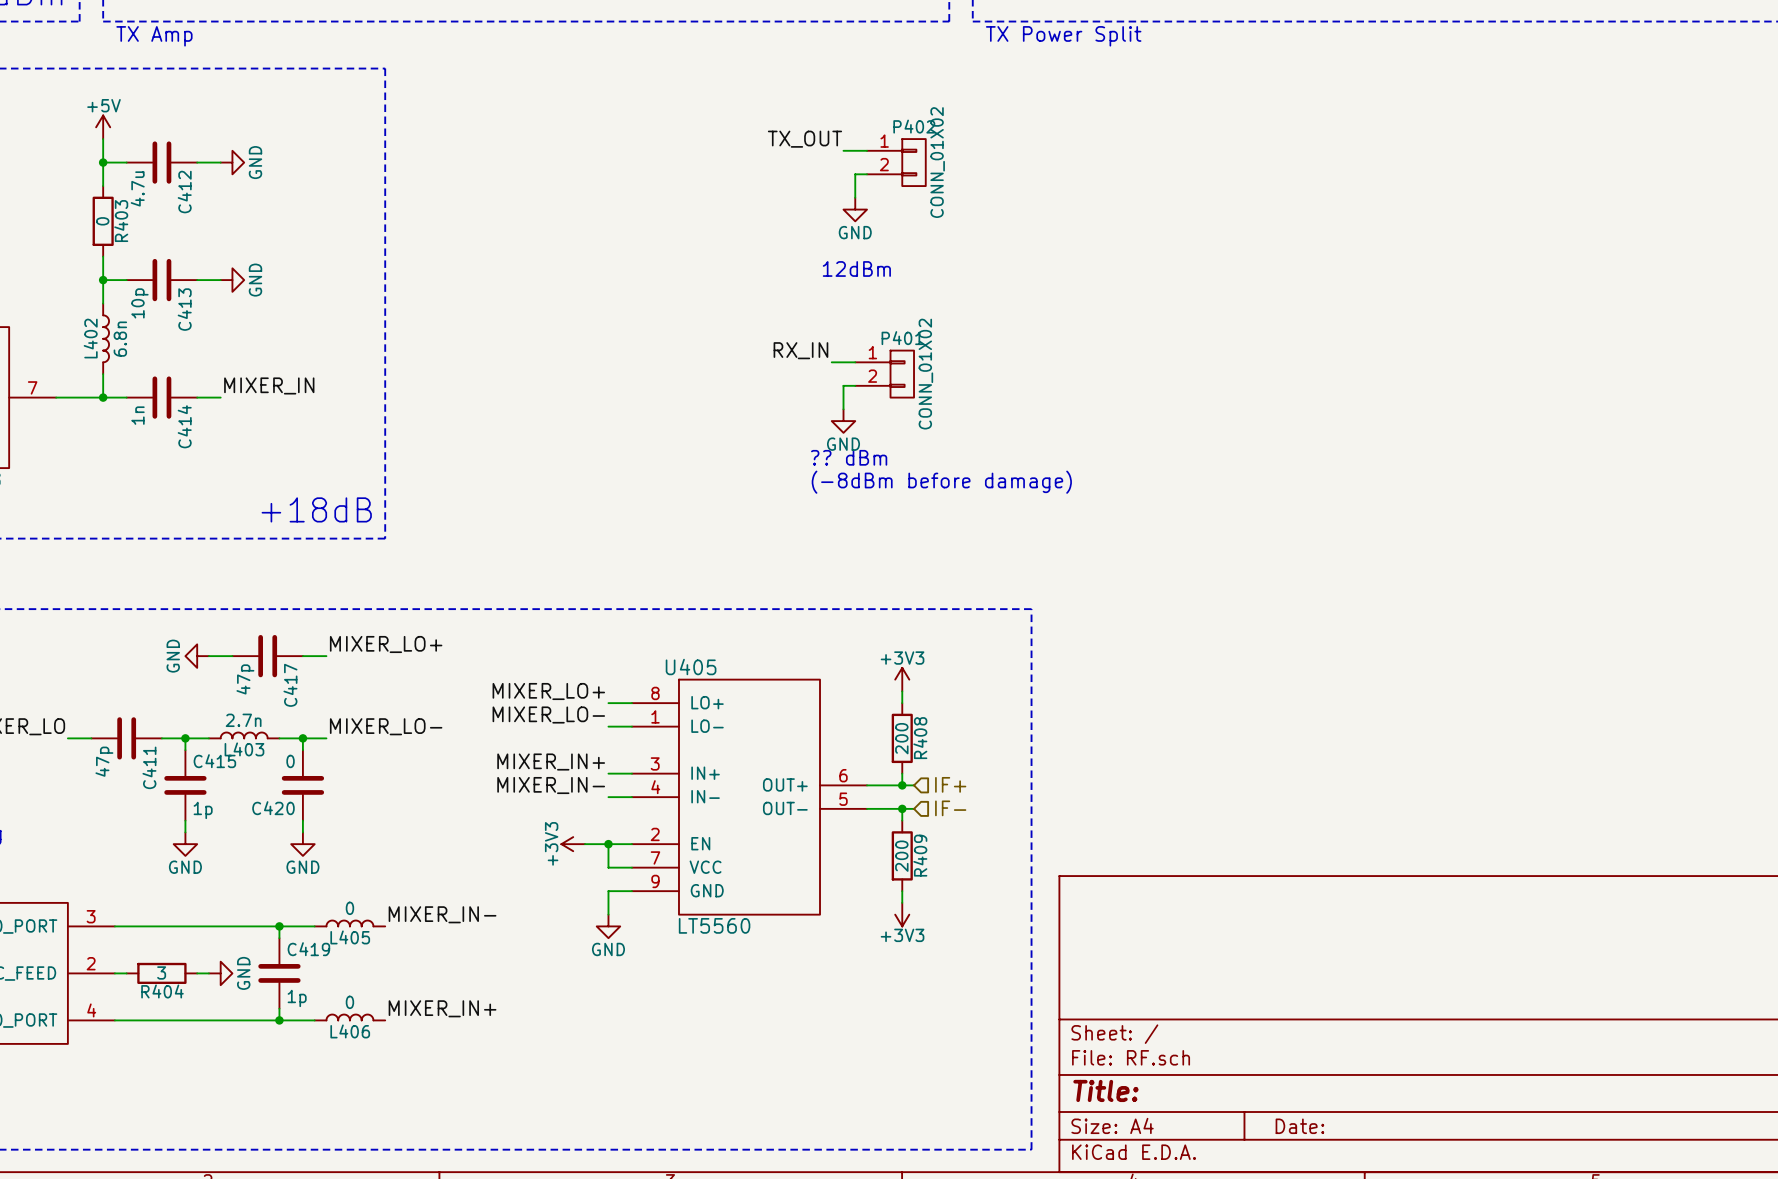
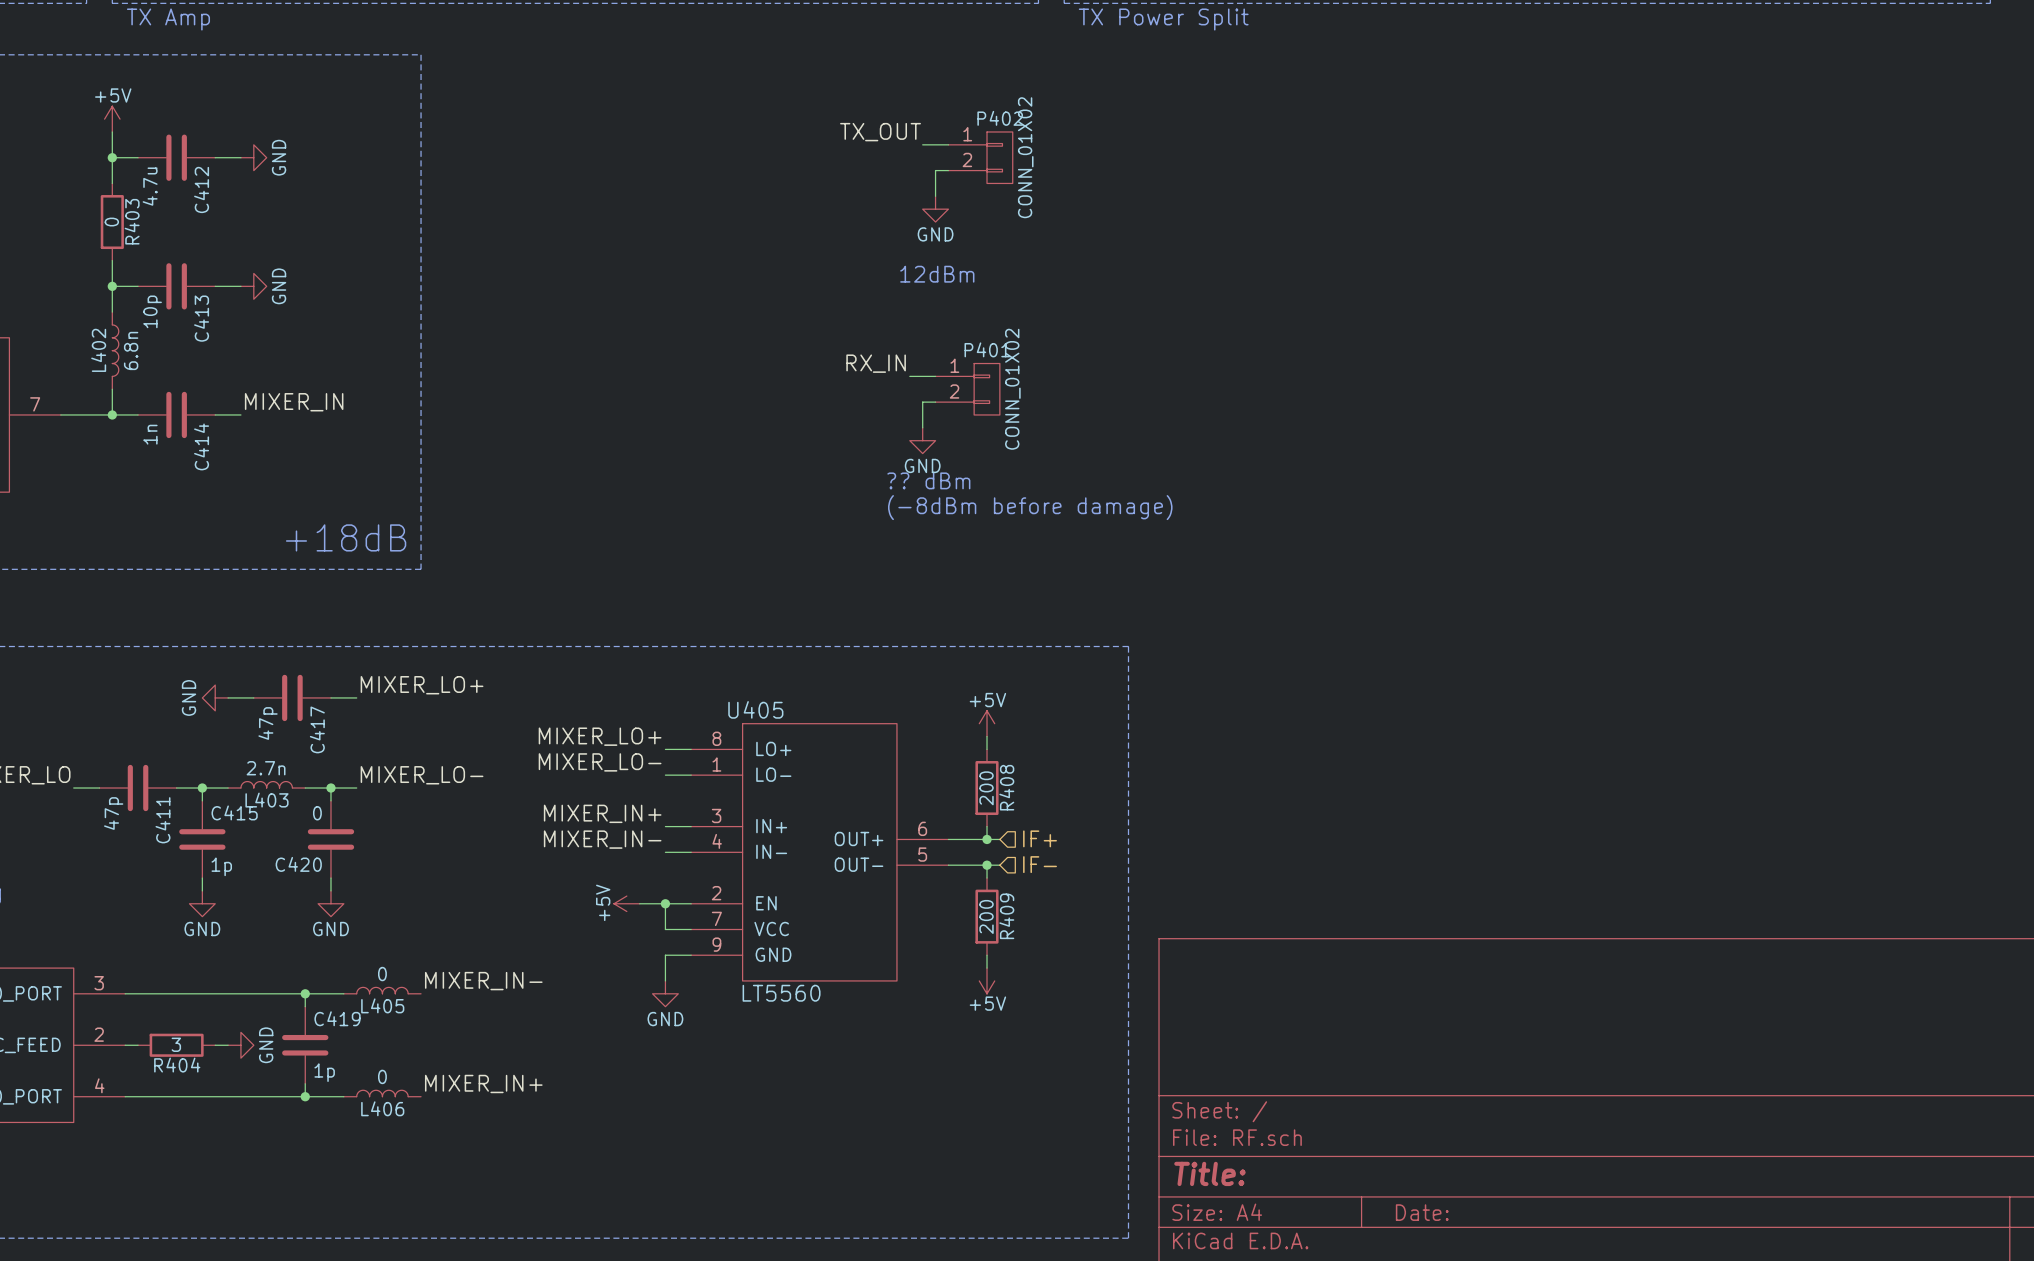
power symbol: +3V3 (902, 679) -> +5V (987, 723)
power symbol: +3V3 (573, 844) -> +5V (626, 903)
power symbol: +3V3 (902, 914) -> +5V (987, 980)

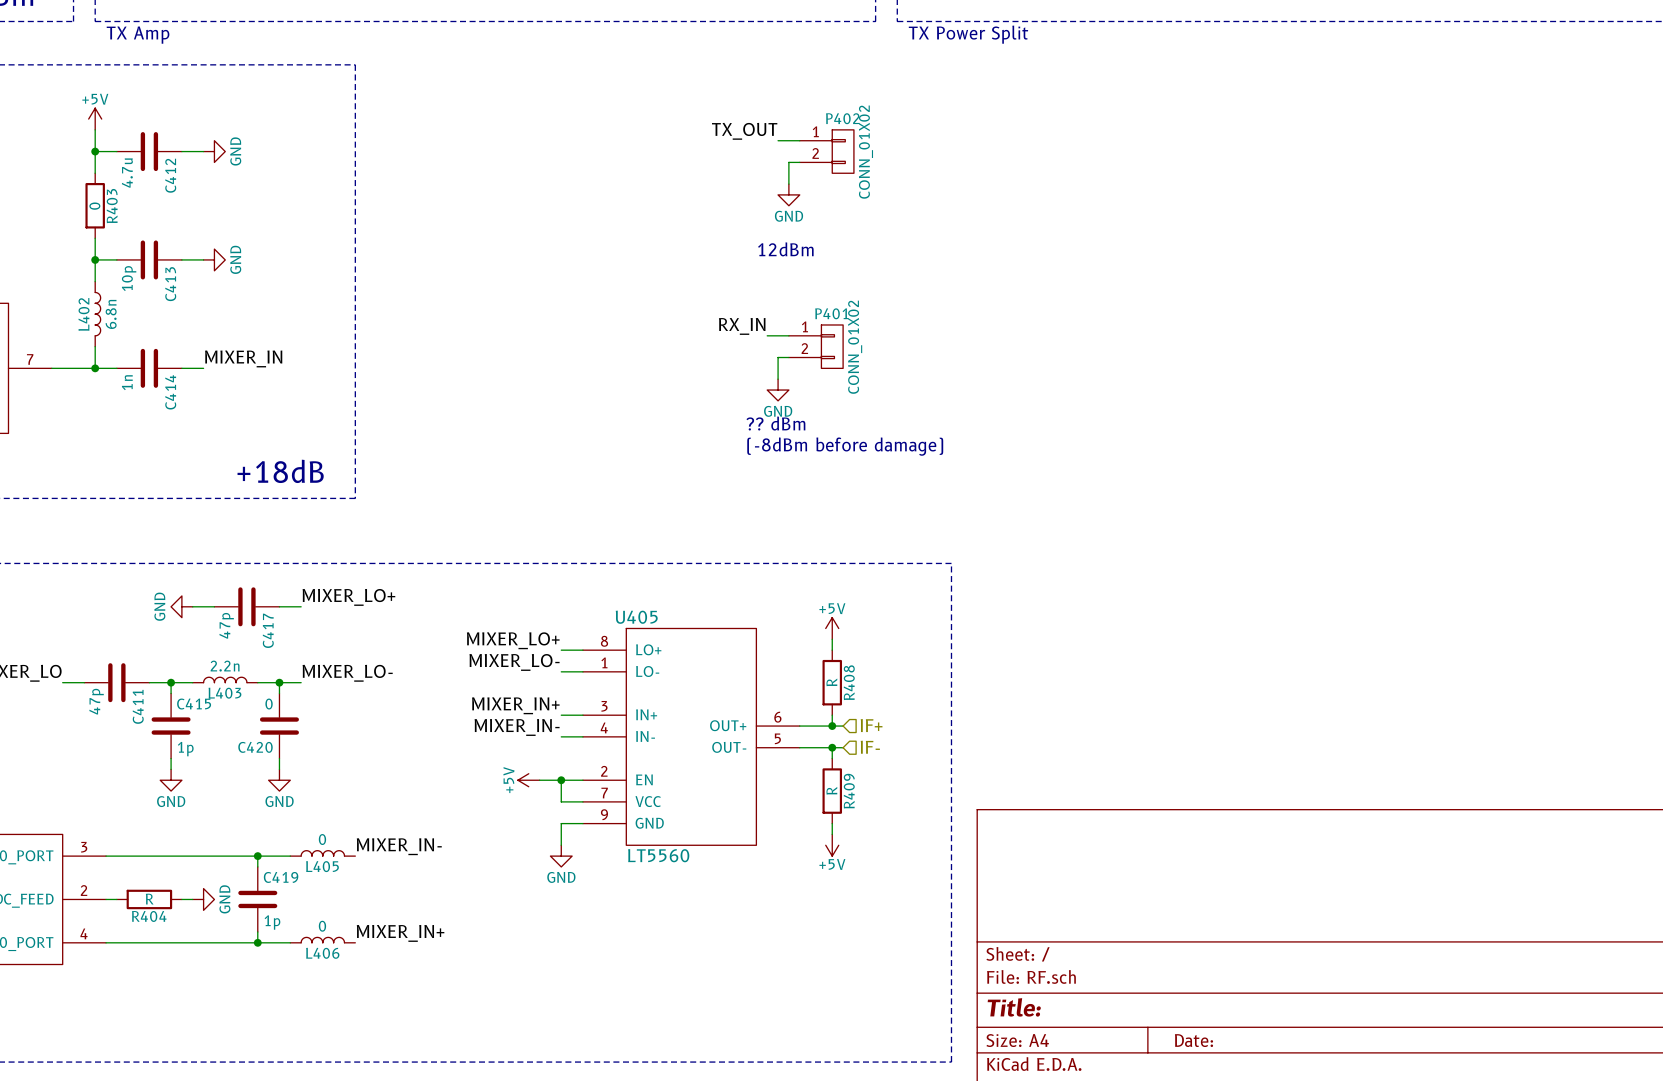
L403 value: 2.7n (266, 768) -> 2.2n (225, 666)
R408 value: 200 (986, 788) -> R (831, 682)
R409 value: 200 (986, 916) -> R (831, 790)
R404 value: 3 (176, 1044) -> R (149, 899)

